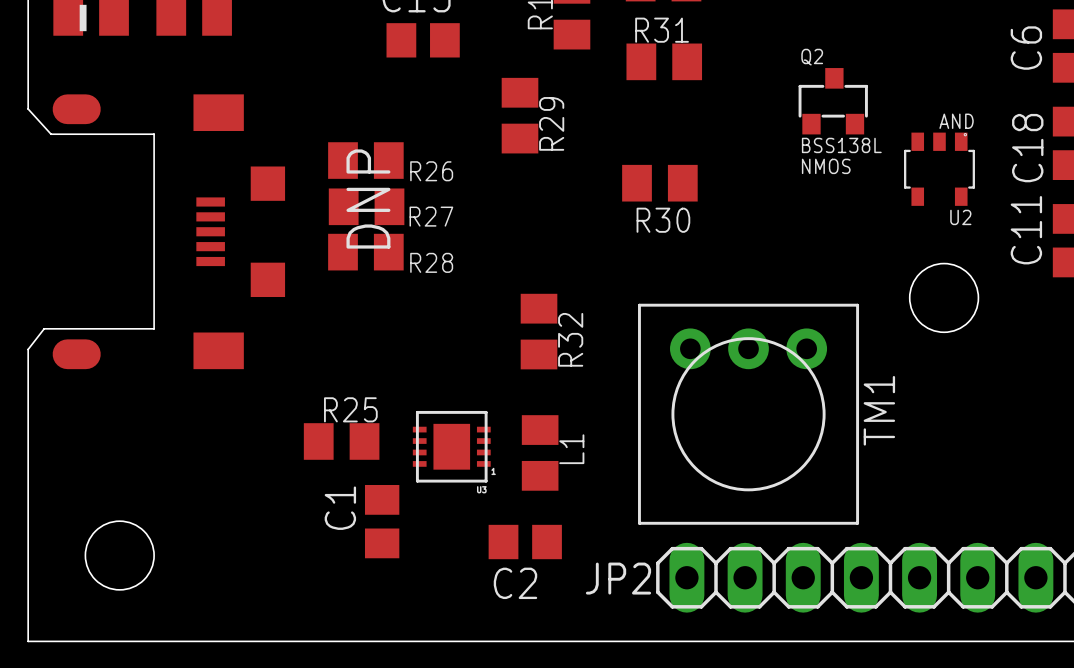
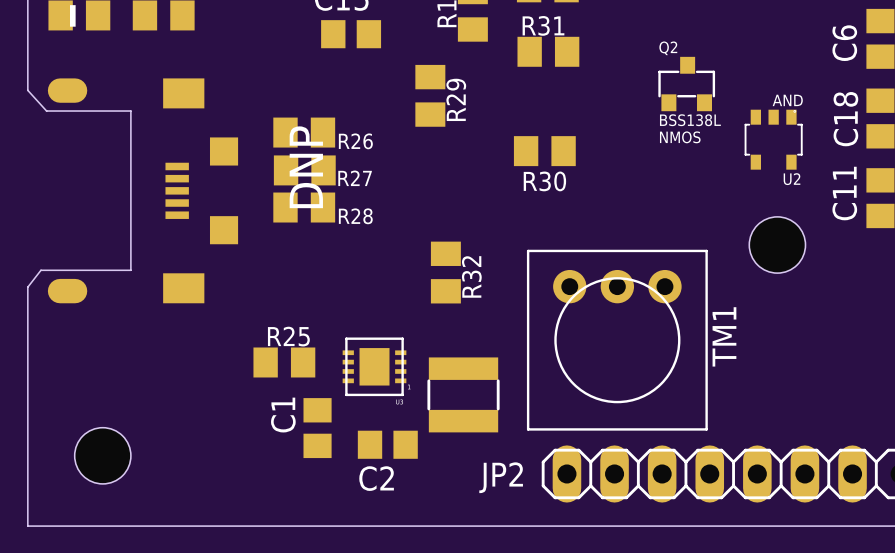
L1: (540, 452) -> none
part: none -> (463, 394)
C2 position: (525, 542) -> (387, 444)

